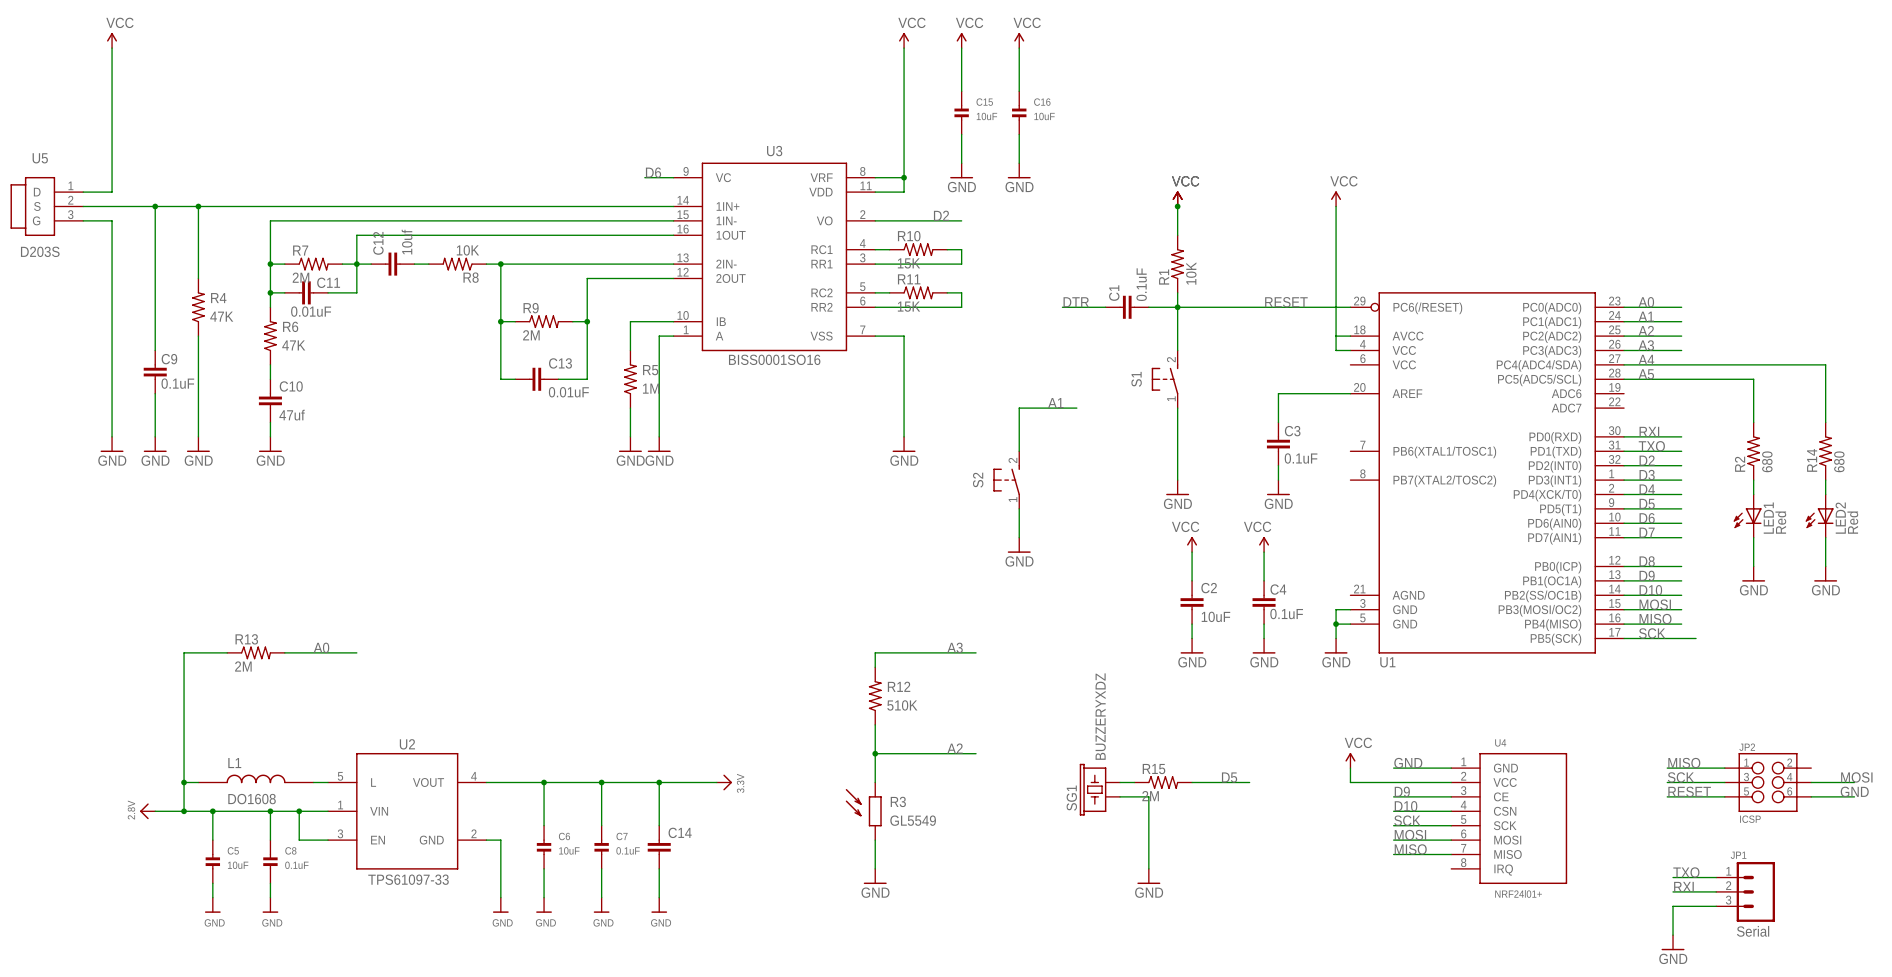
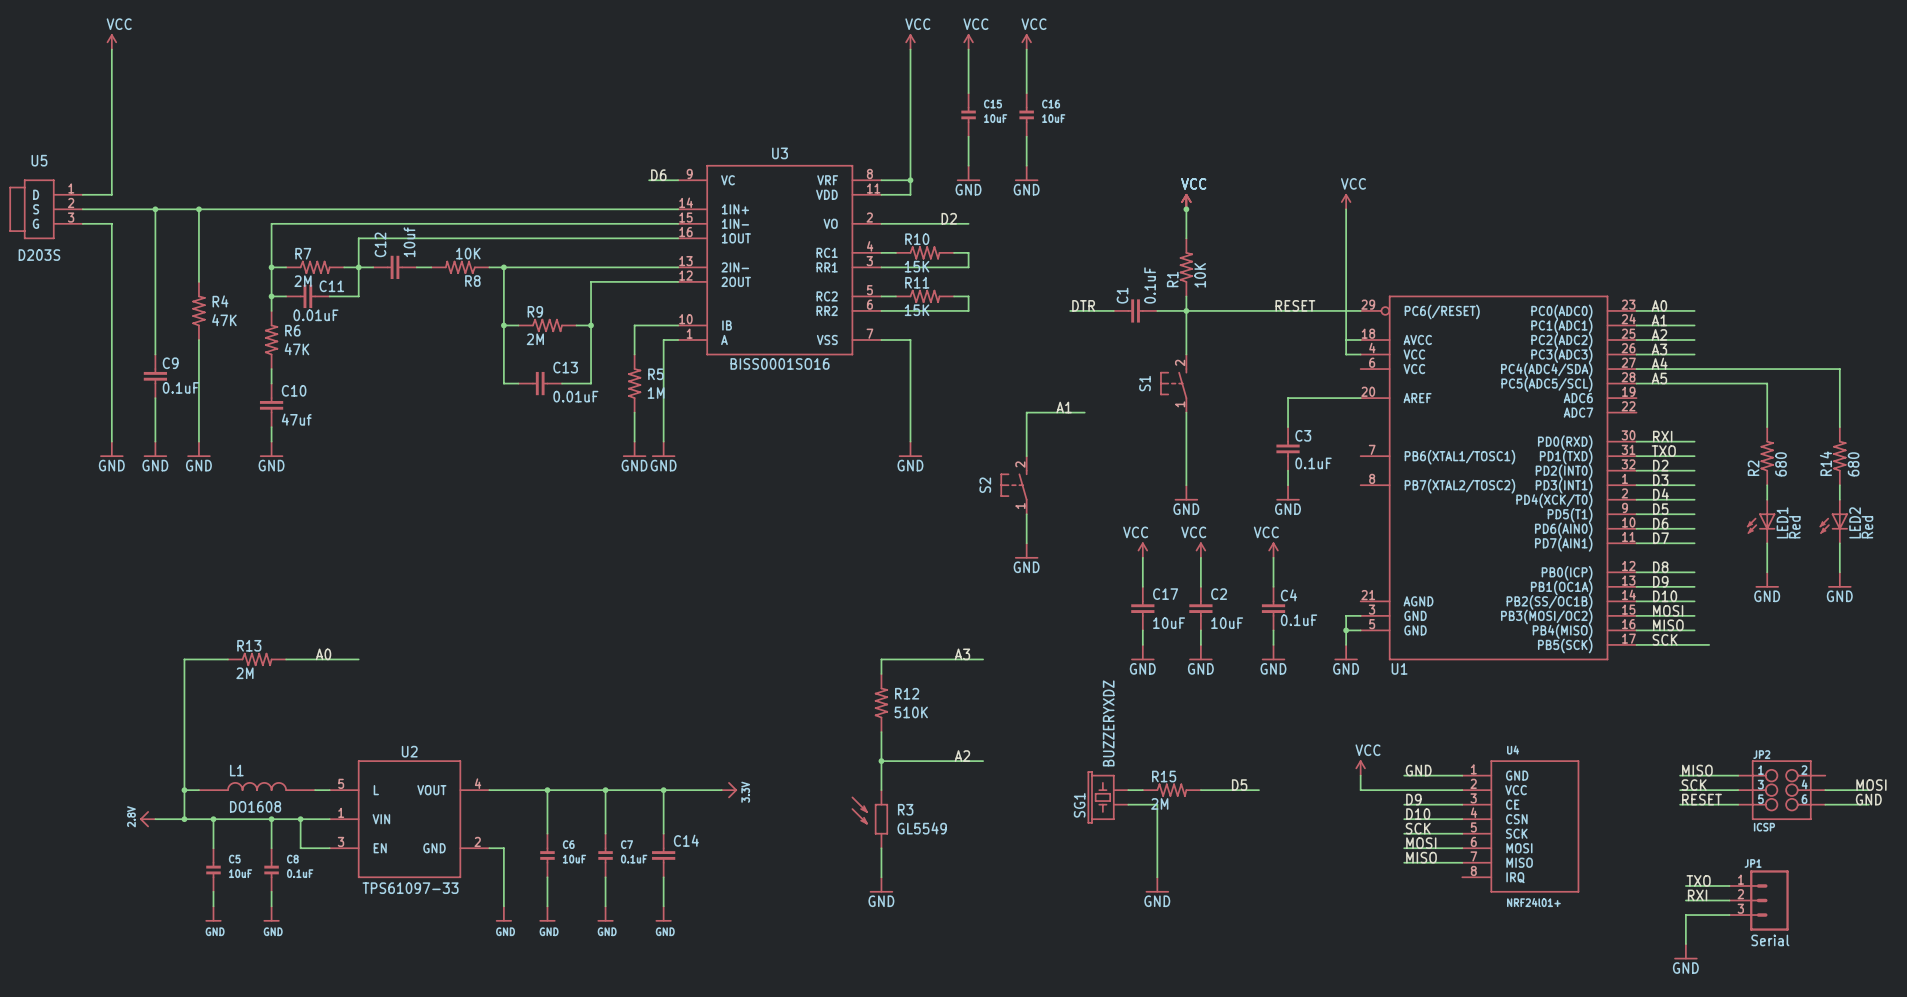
power symbol: none -> VCC (1142, 550)
wire: none -> (1142, 557) (1142, 586)
C17: none -> 10uF (1142, 608)
wire: none -> (1142, 630) (1142, 644)
power symbol: none -> GND (1142, 652)

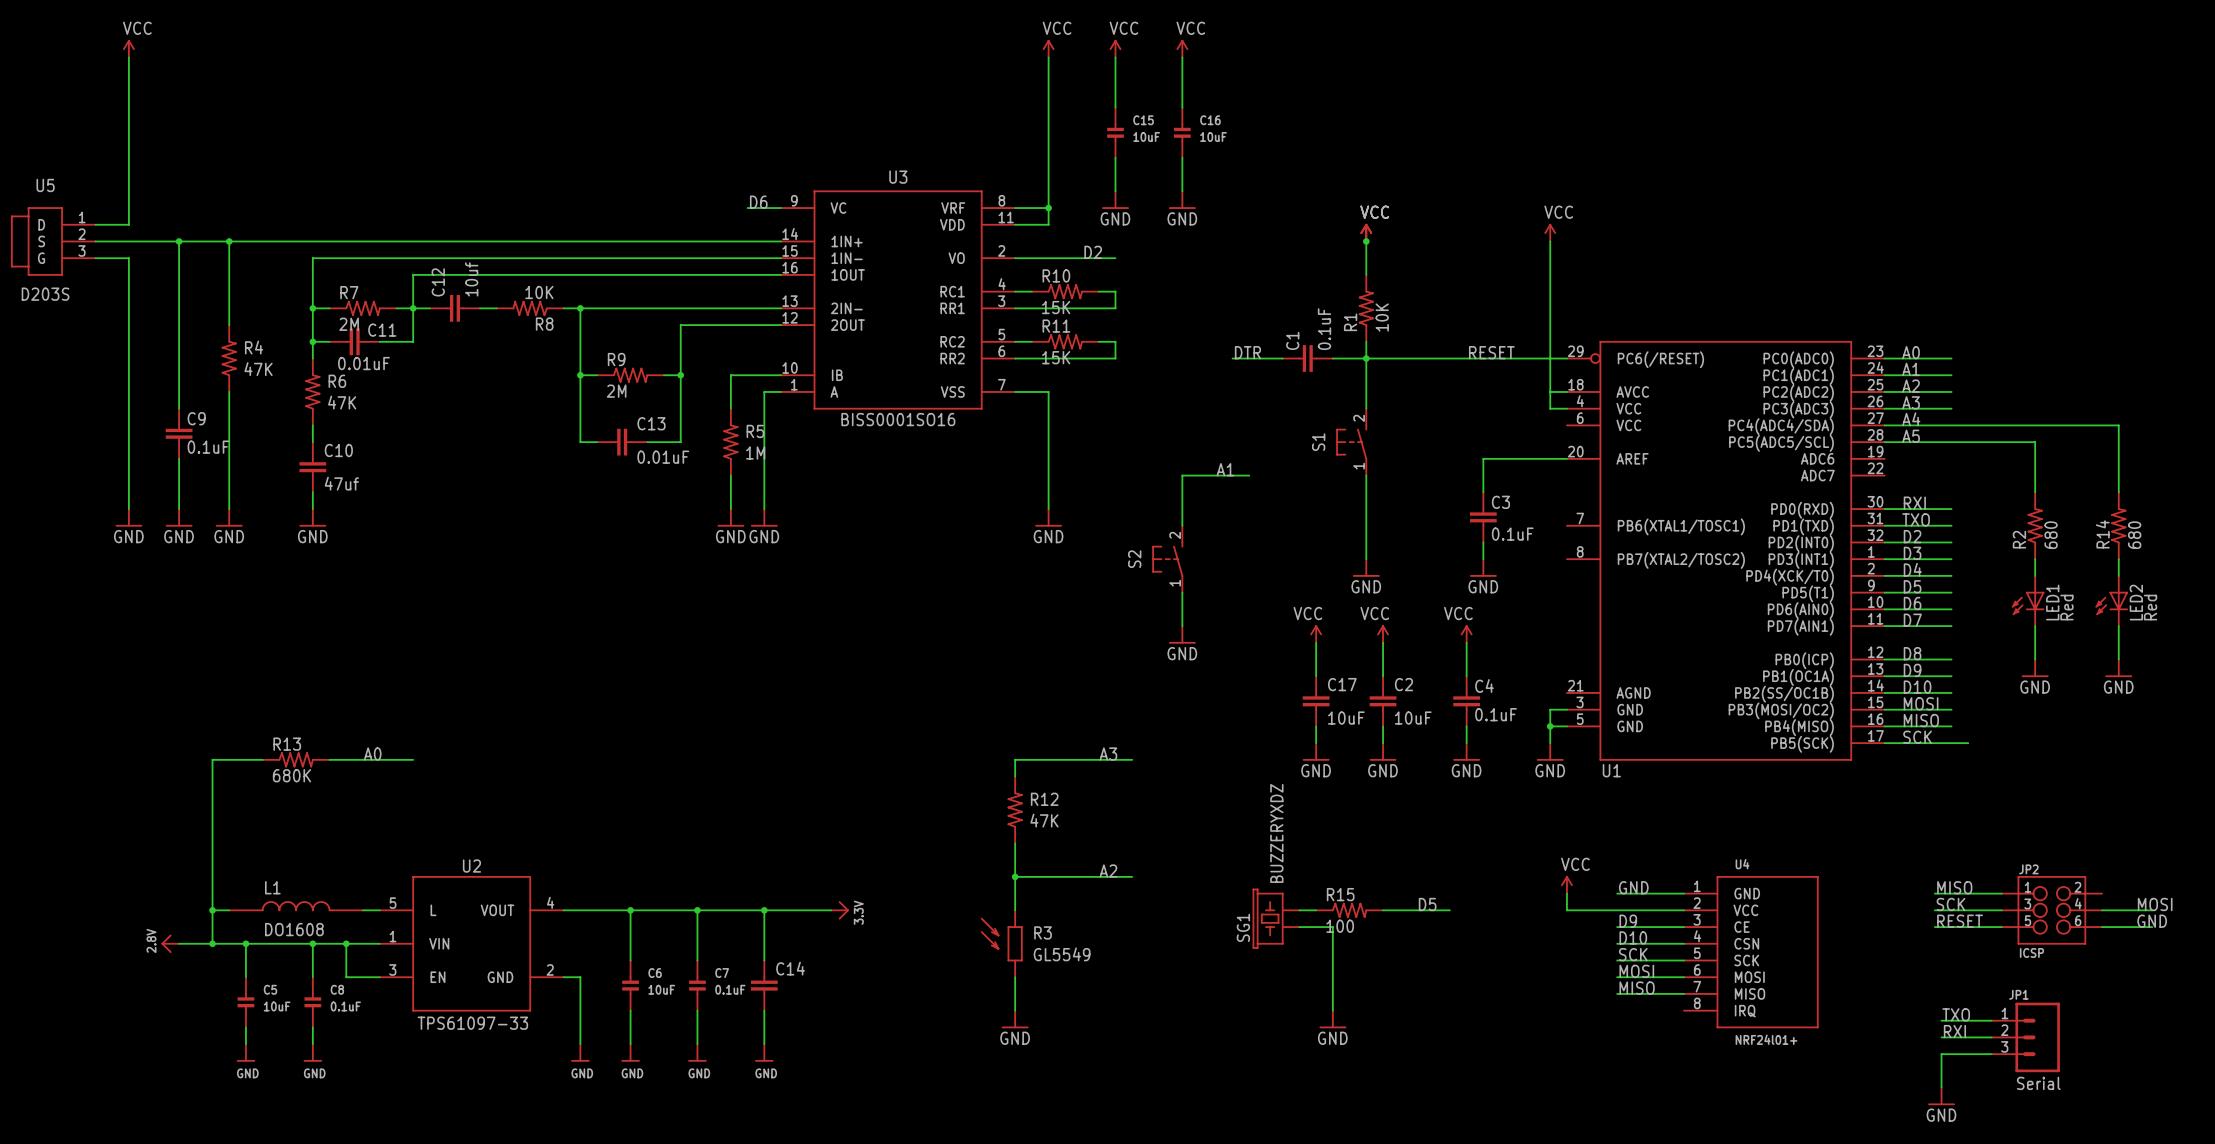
R13 value: 2M (244, 673) -> 680K (291, 775)
R12 value: 510K (911, 712) -> 47K (1044, 820)
R15 value: 2M (1159, 803) -> 100 (1340, 926)

